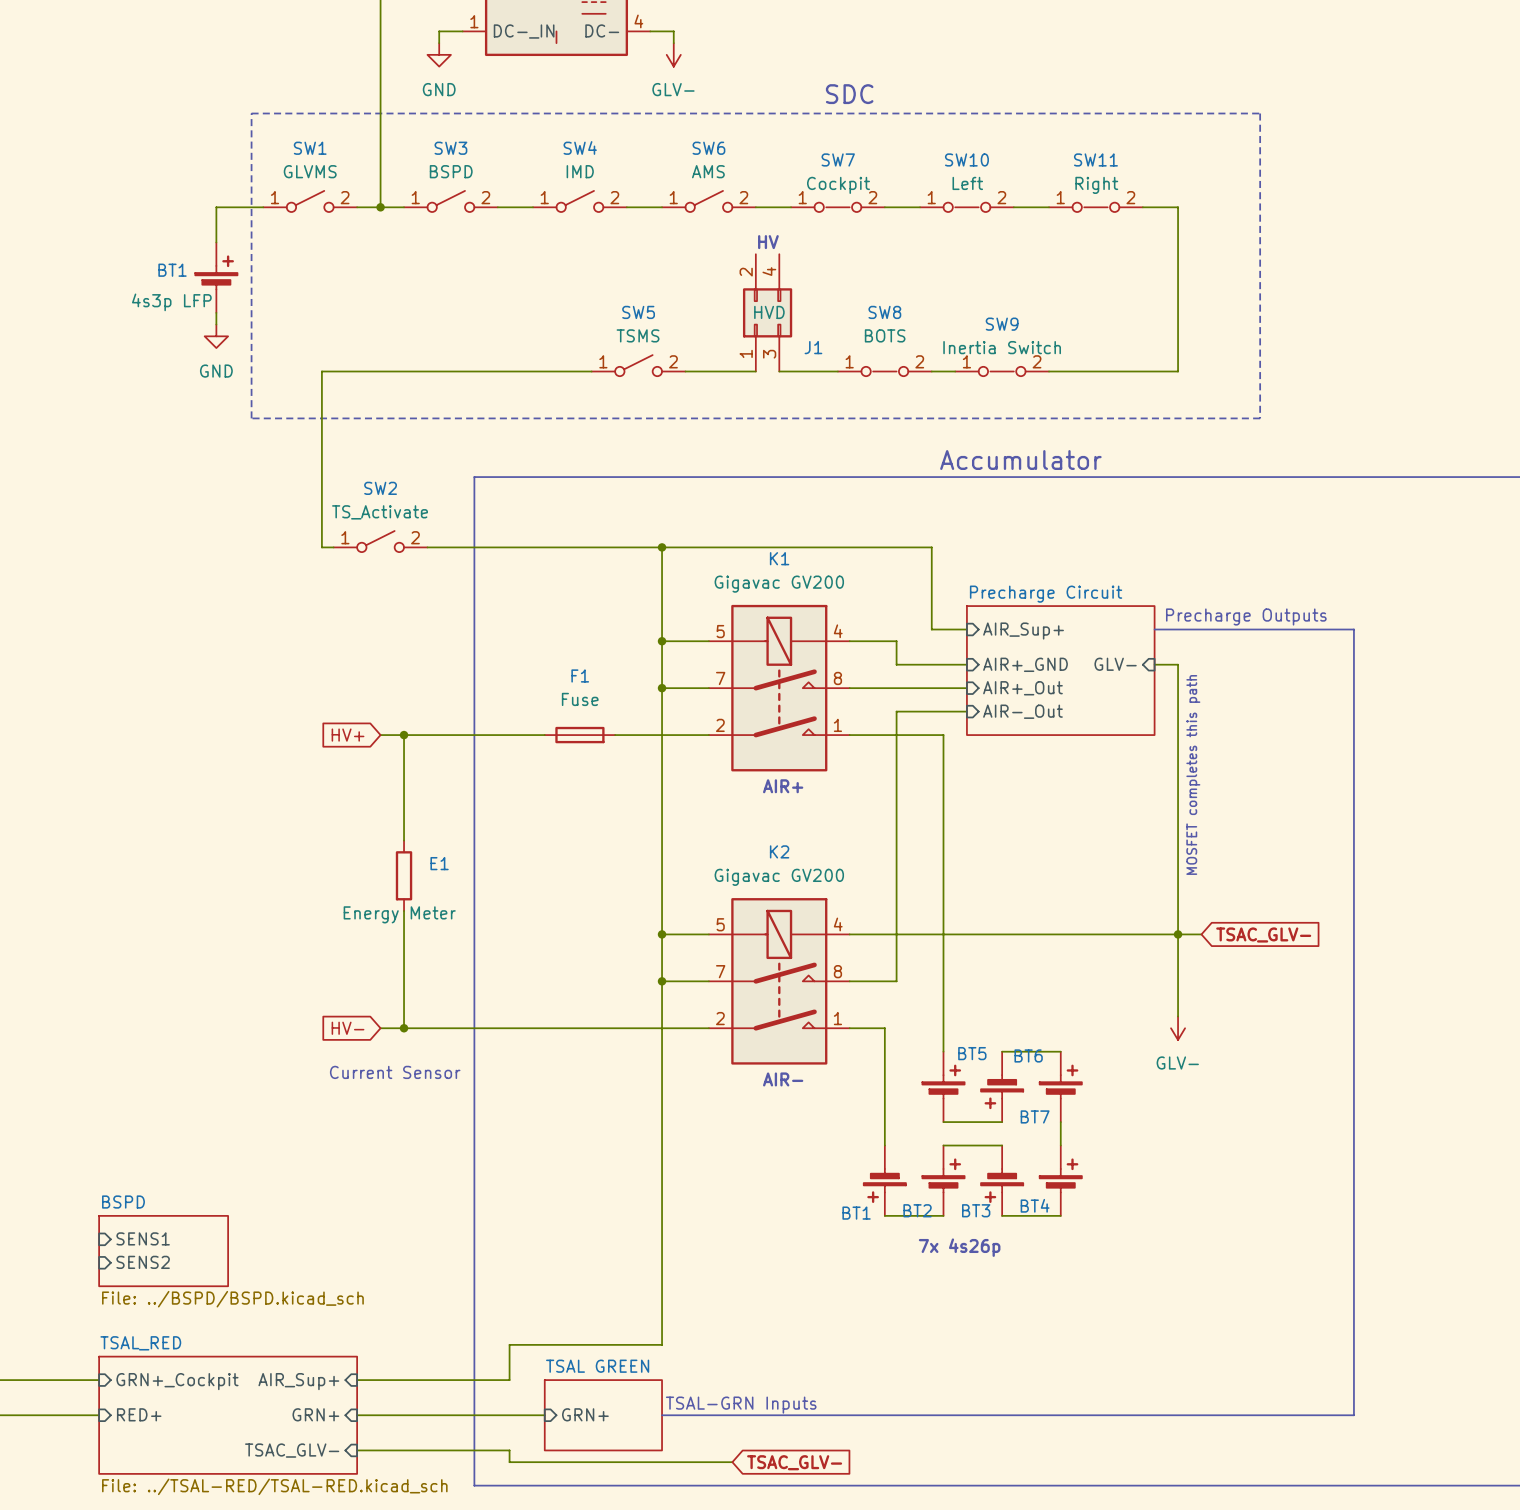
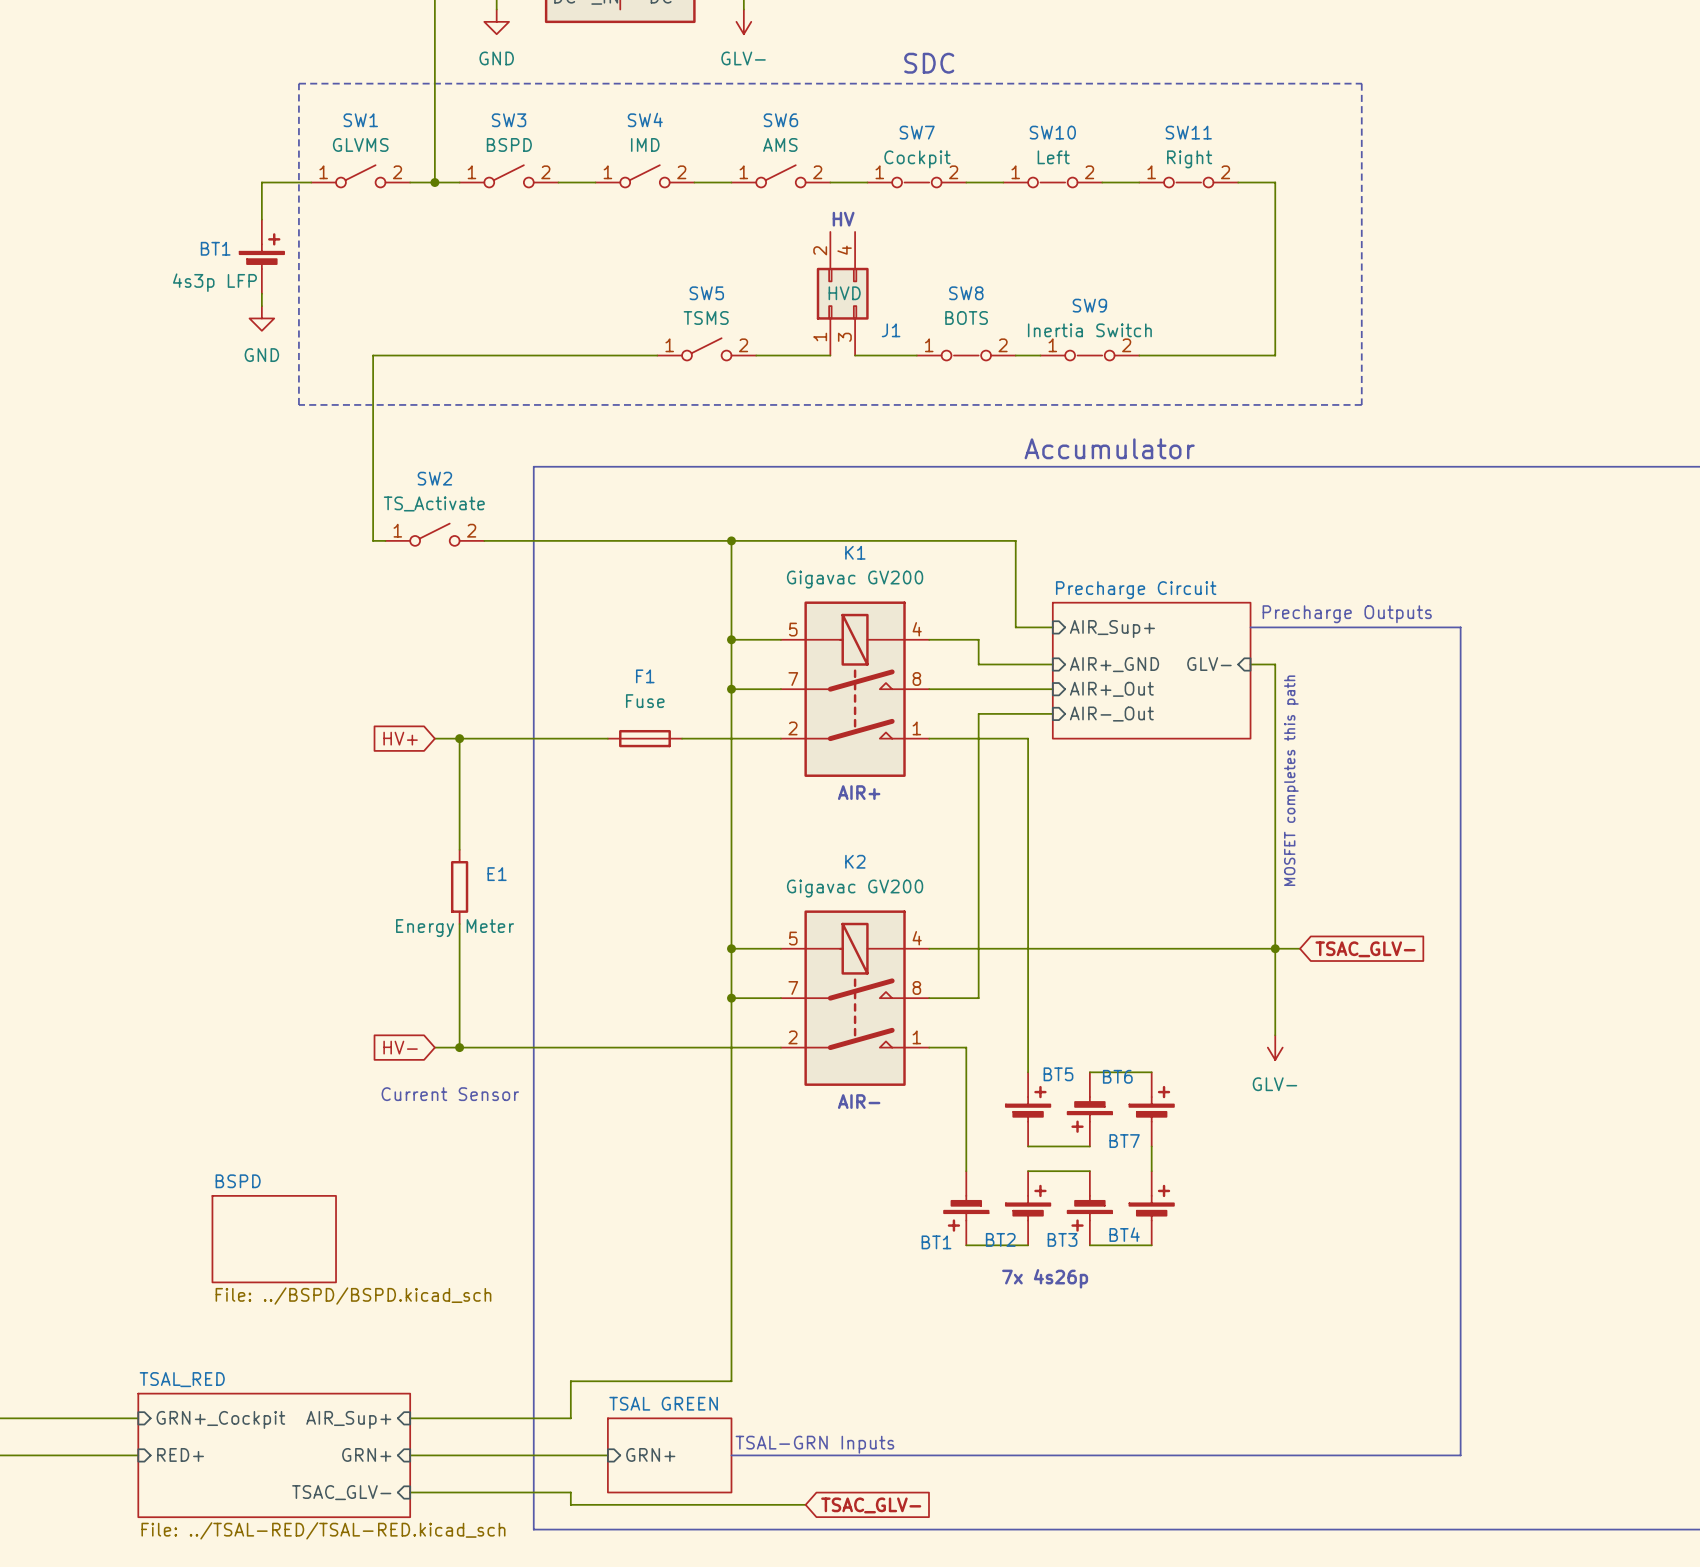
sheet BSPD: none -> File: ../BSPD/BSPD.kicad_sch (274, 1239)
sheet pin: SENS1 (143, 1238) -> none
sheet BSPD: File: ../BSPD/BSPD.kicad_sch (163, 1251) -> none
sheet pin: SENS2 (143, 1262) -> none

